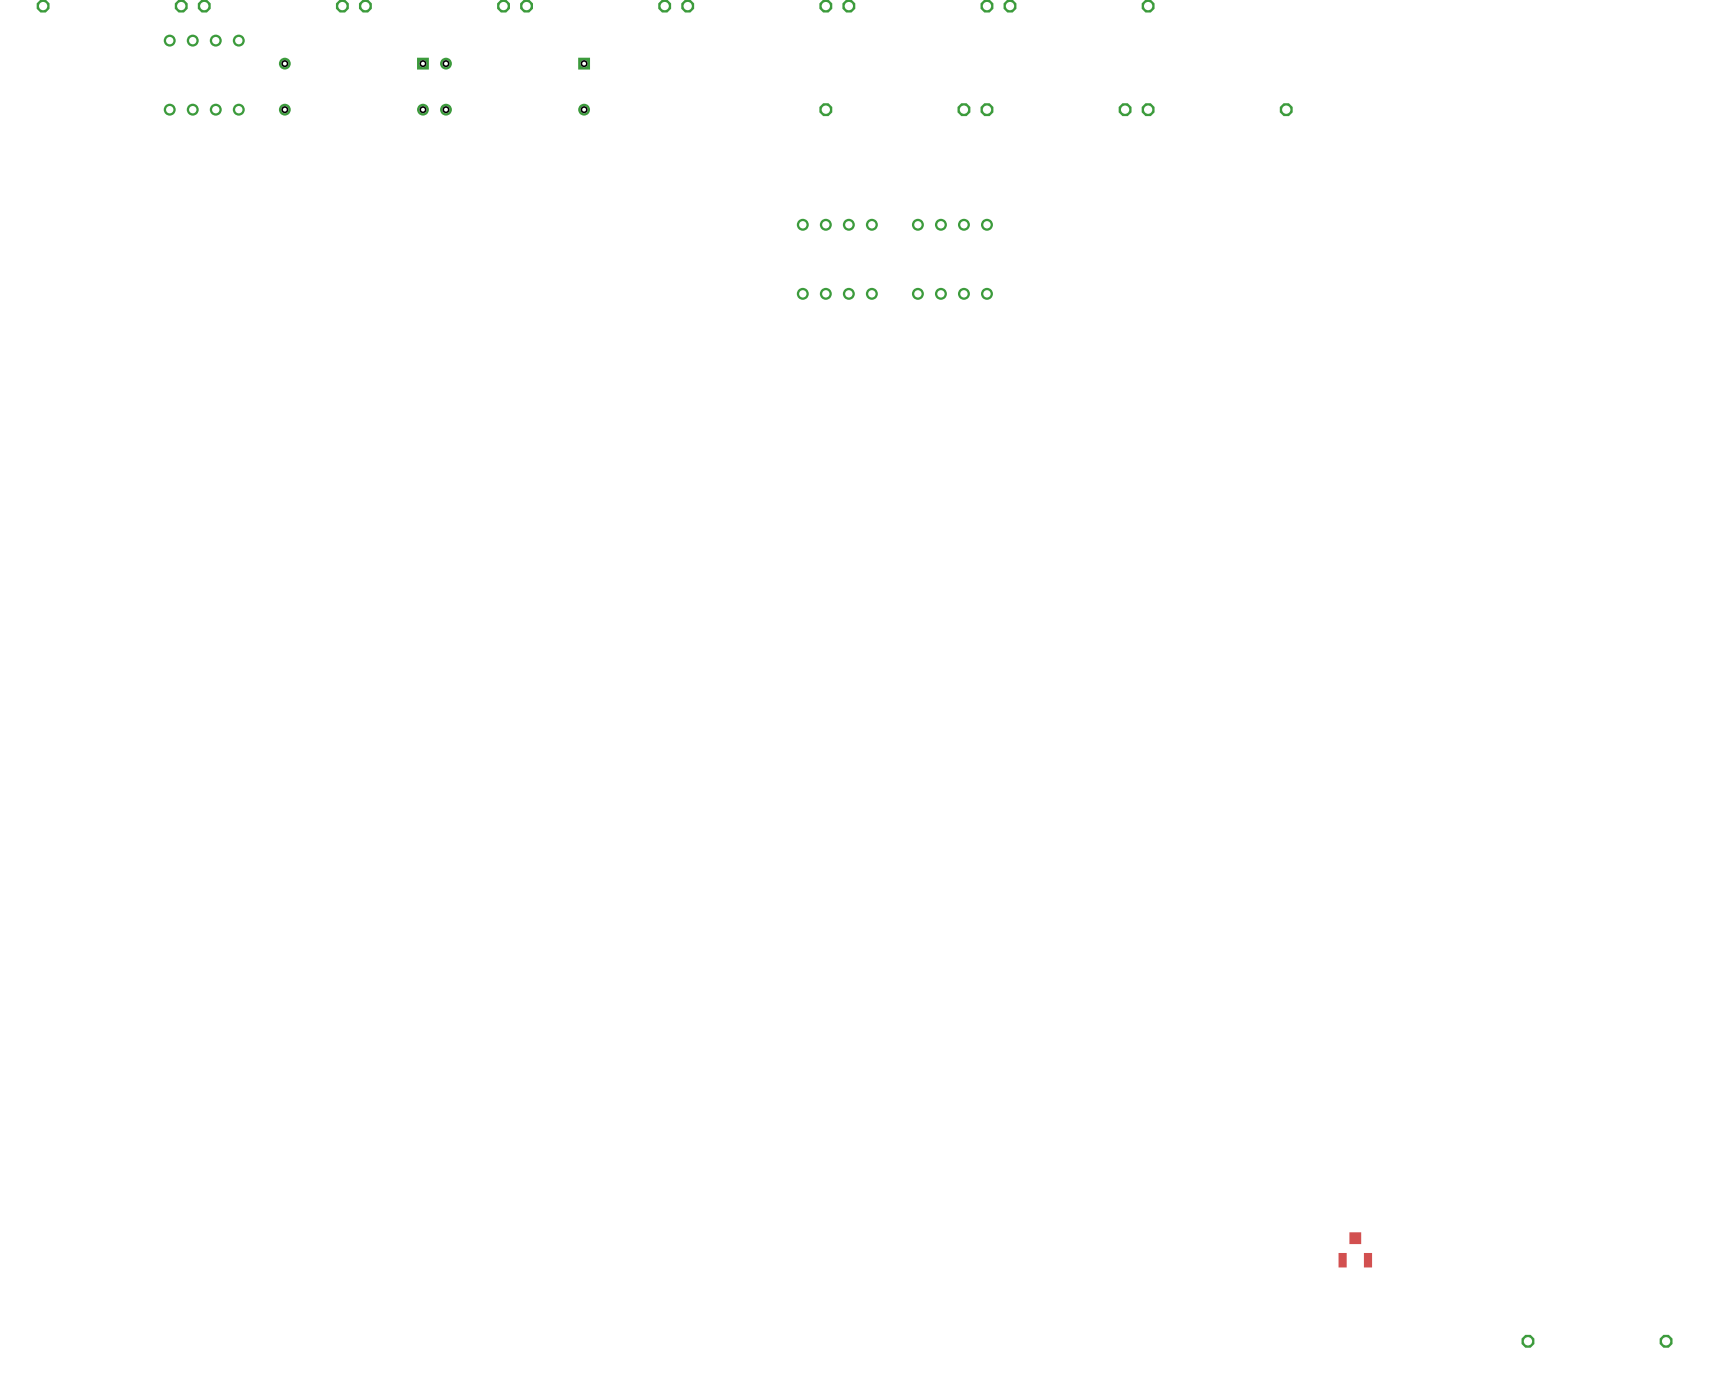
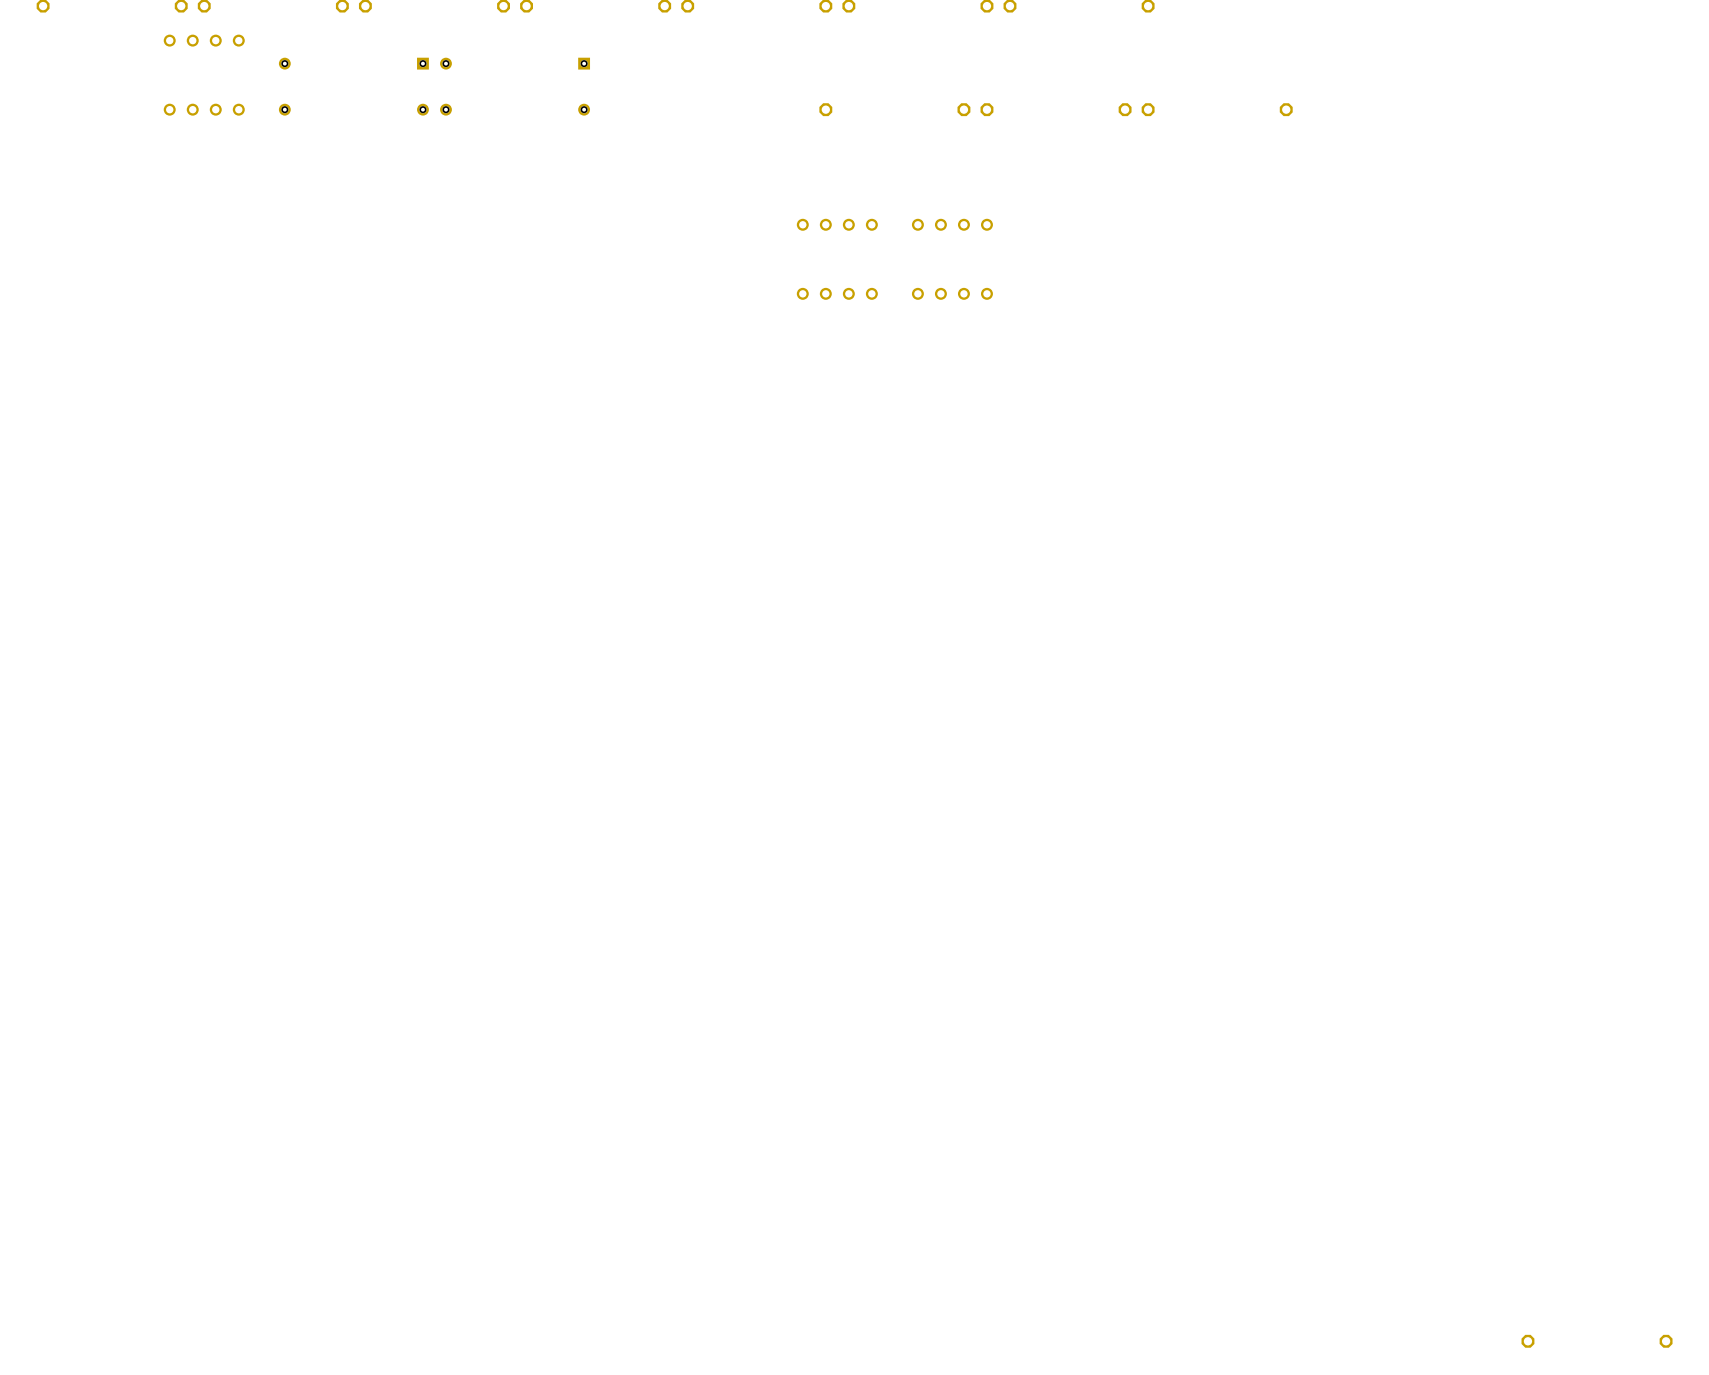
part: (1355, 1249) -> none

